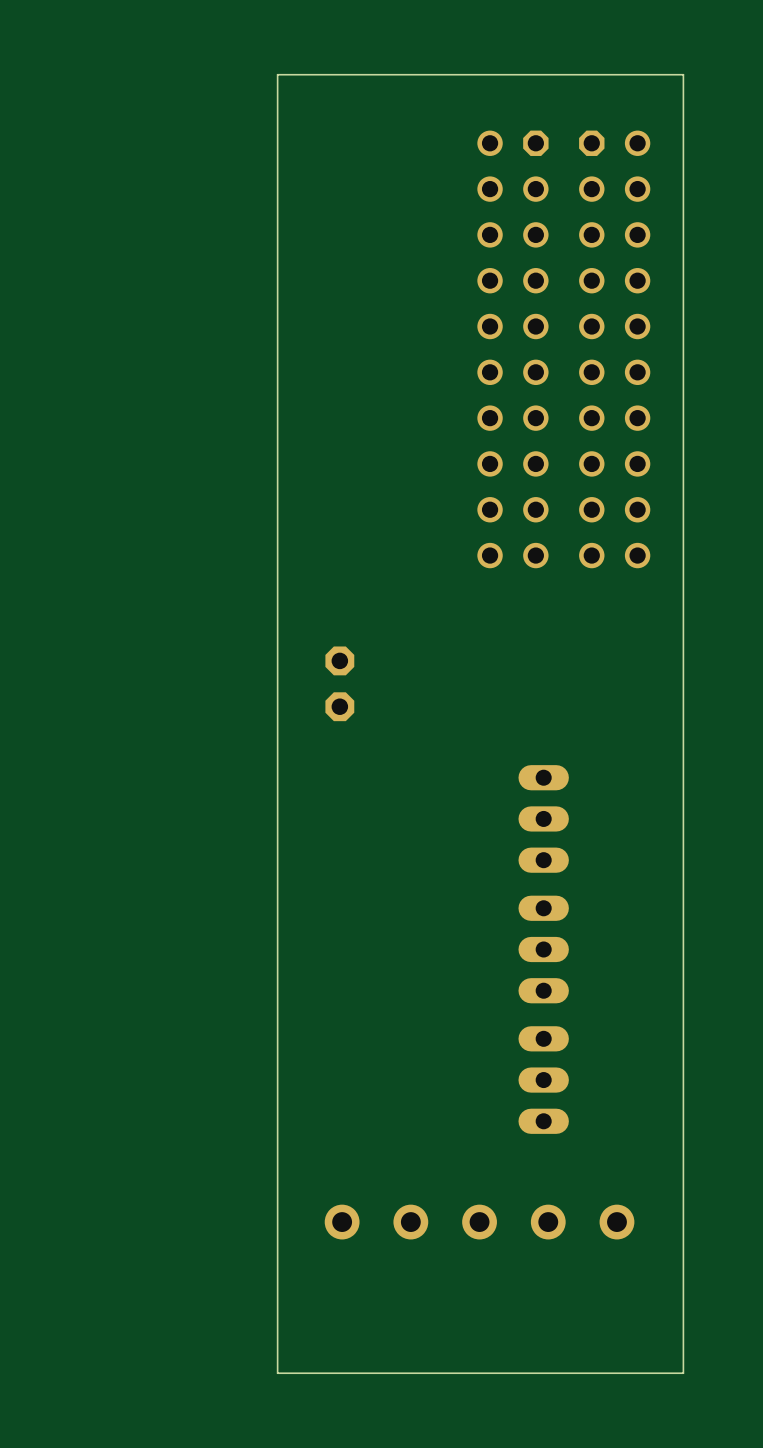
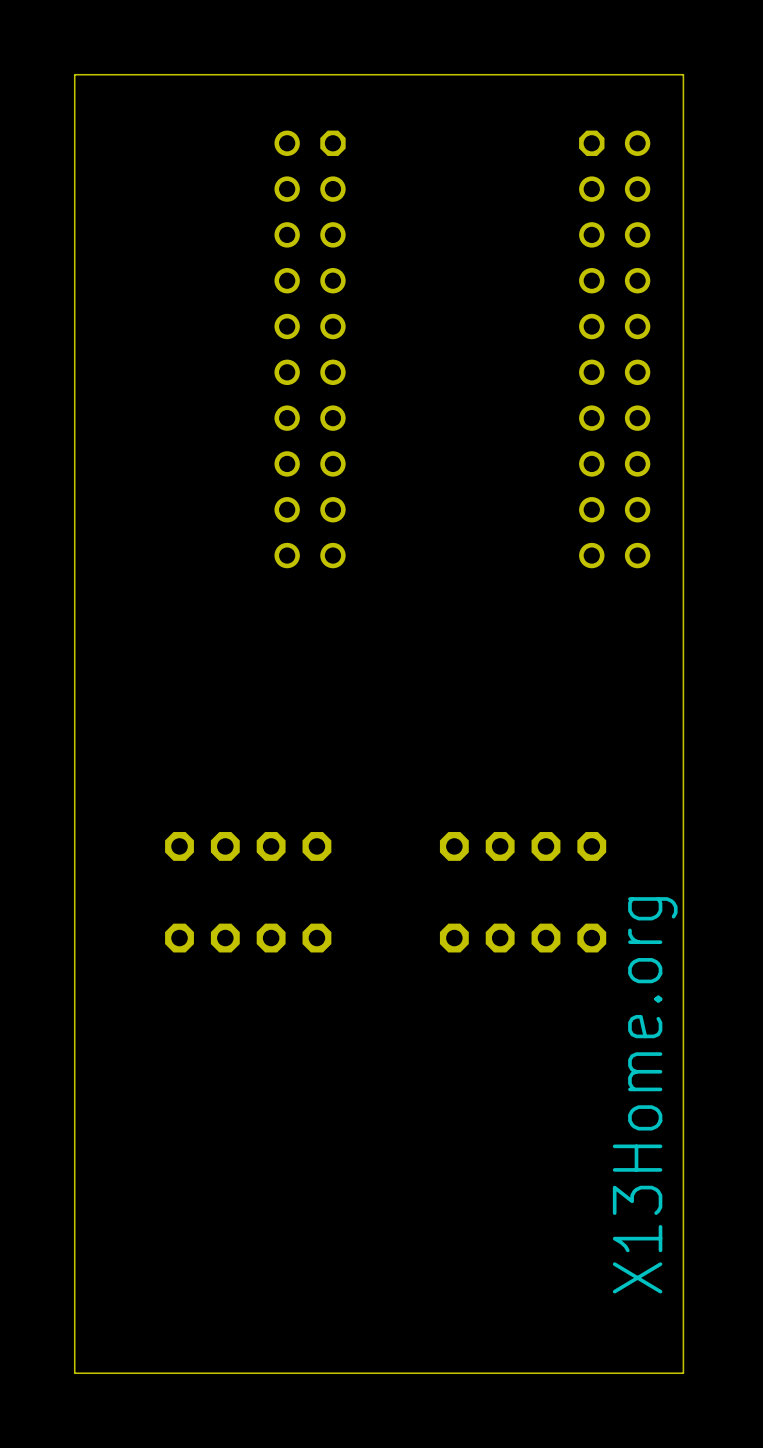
board edge: (277, 74) (277, 1373) -> (277, 74) (74, 74) (74, 1373) (277, 1373)
part position: (512, 349) -> (310, 349)
part: (339, 660) -> none
part: (339, 706) -> none
part: (543, 818) -> none
part: none -> (179, 846)
part: none -> (225, 846)
part: none -> (271, 846)
part: none -> (316, 846)
part: none -> (454, 846)
part: none -> (500, 846)
part: none -> (545, 846)
part: none -> (591, 846)
part footprint: [518, 895, 569, 1004] -> [531, 923, 561, 953]
part: none -> (179, 938)
part: none -> (225, 938)
part: none -> (271, 938)
part: none -> (316, 938)
part: none -> (454, 938)
part: none -> (500, 938)
part: none -> (591, 938)
part: (543, 1080) -> none
text: none -> X13Home.org (645, 1095)
part: (479, 1222) -> none

